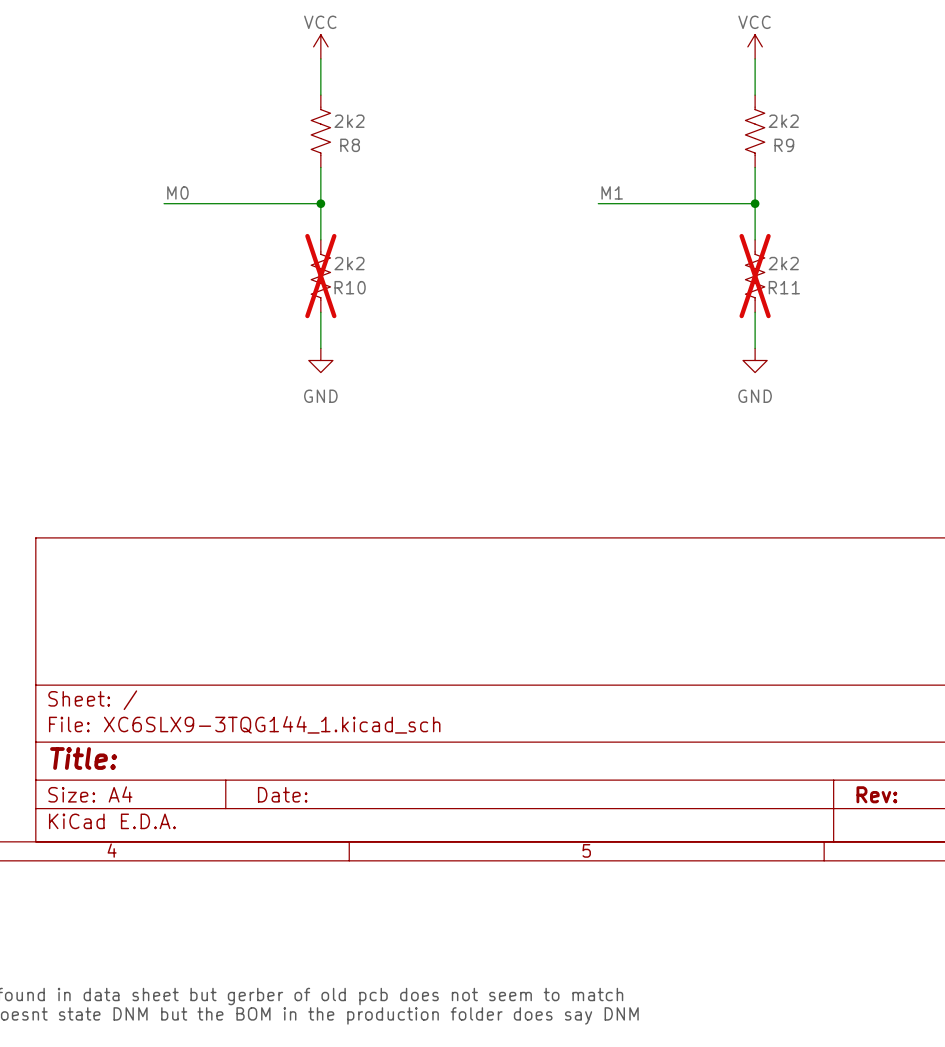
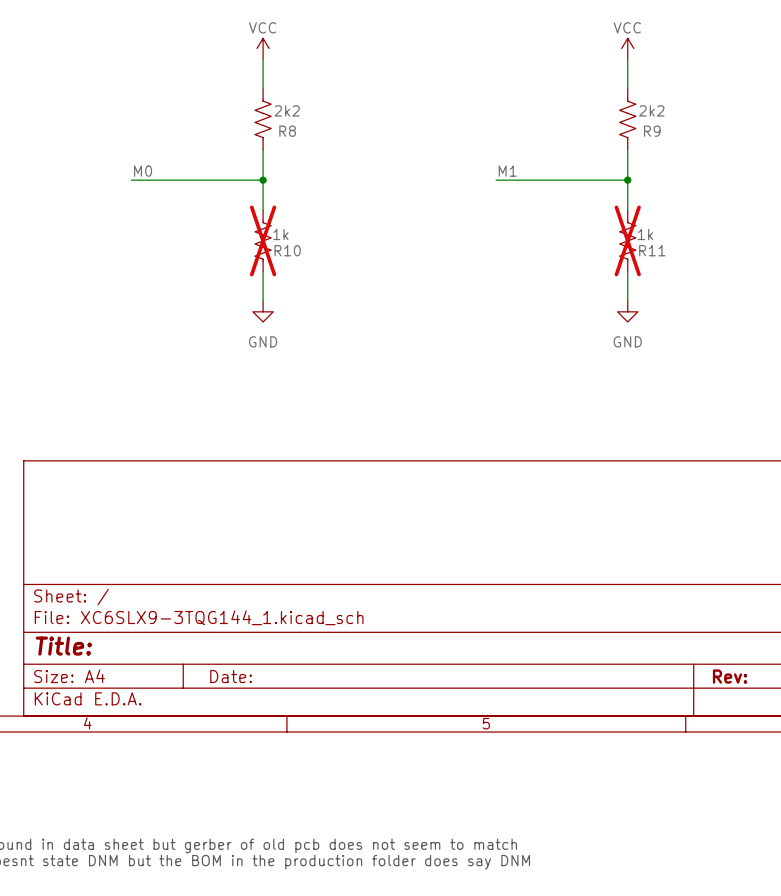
R10 text: 2k2 (349, 263) -> 1k (280, 234)
R11 text: 2k2 (783, 263) -> 1k (645, 234)

